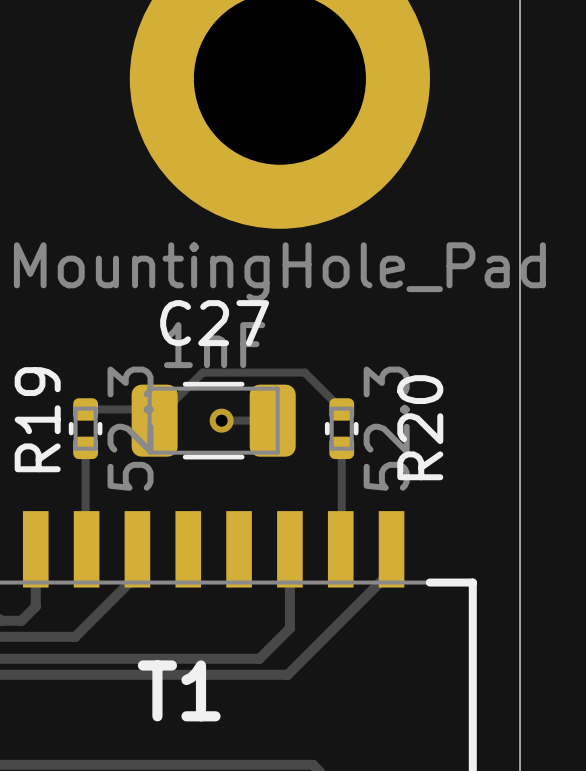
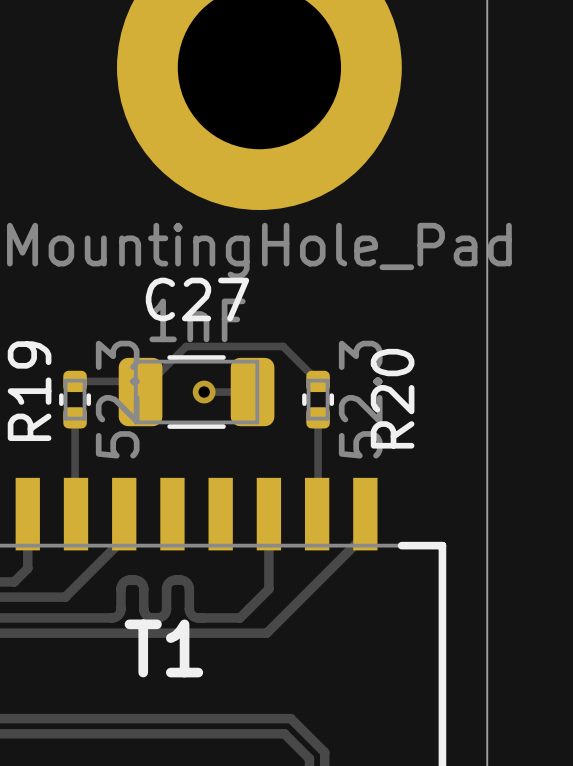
track: (124, 658) (167, 658) -> (111, 617) (120, 612) (121, 586) (124, 581) (130, 580) (137, 580) (142, 584) (144, 611) (148, 616) (152, 617)
track: (172, 658) (215, 658) -> (157, 617) (165, 612) (167, 586) (169, 581) (175, 580) (183, 580) (187, 584) (189, 611) (193, 616) (198, 617)

